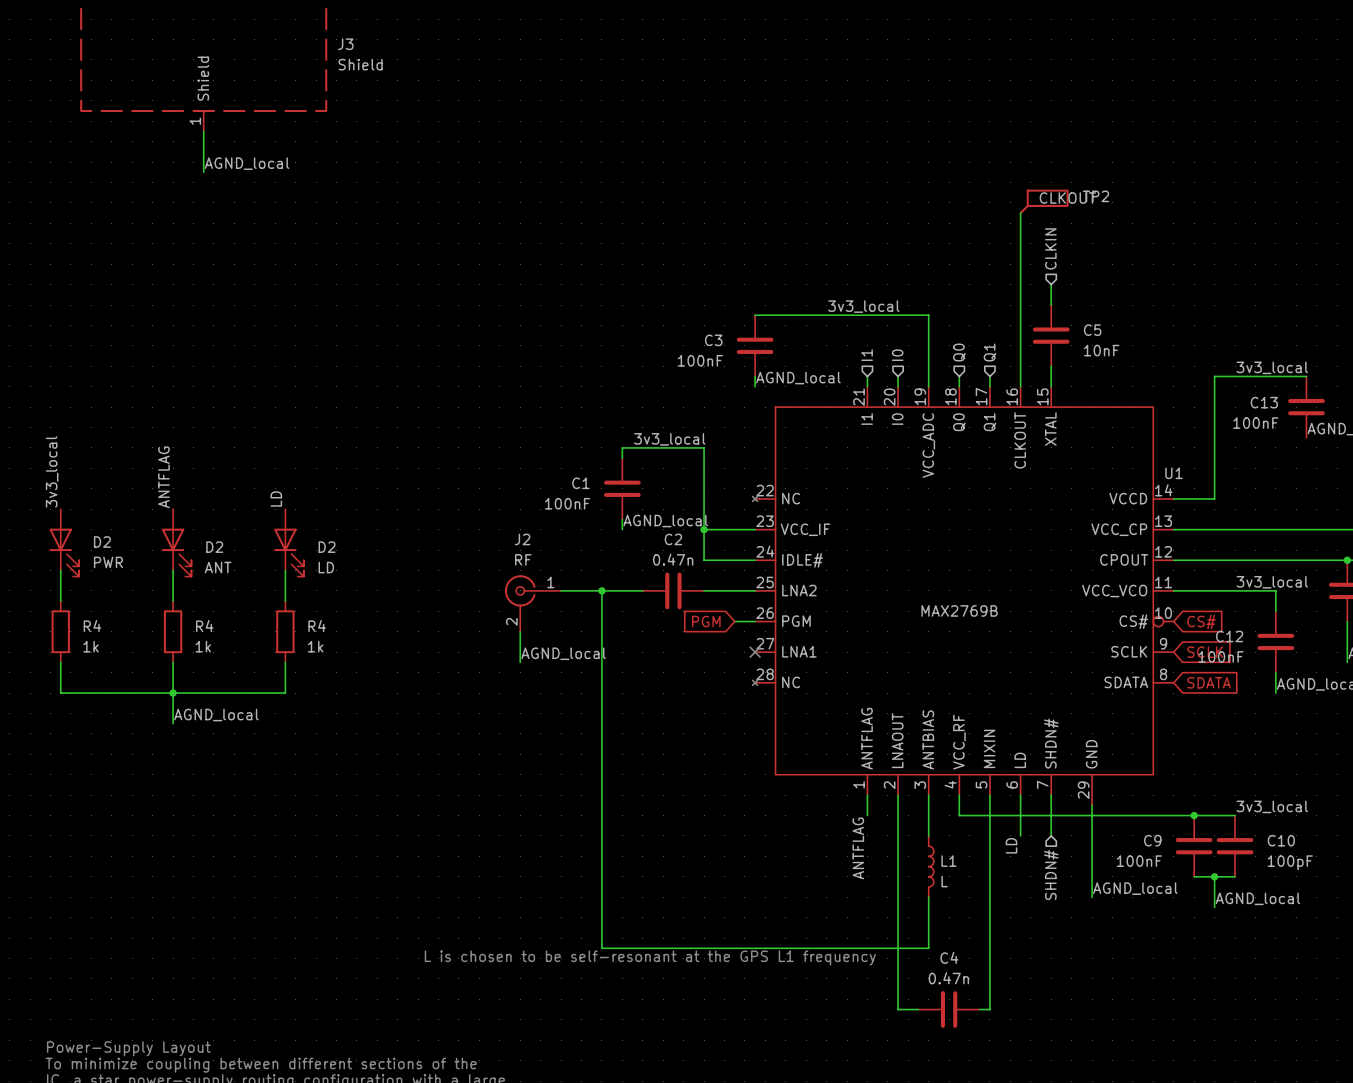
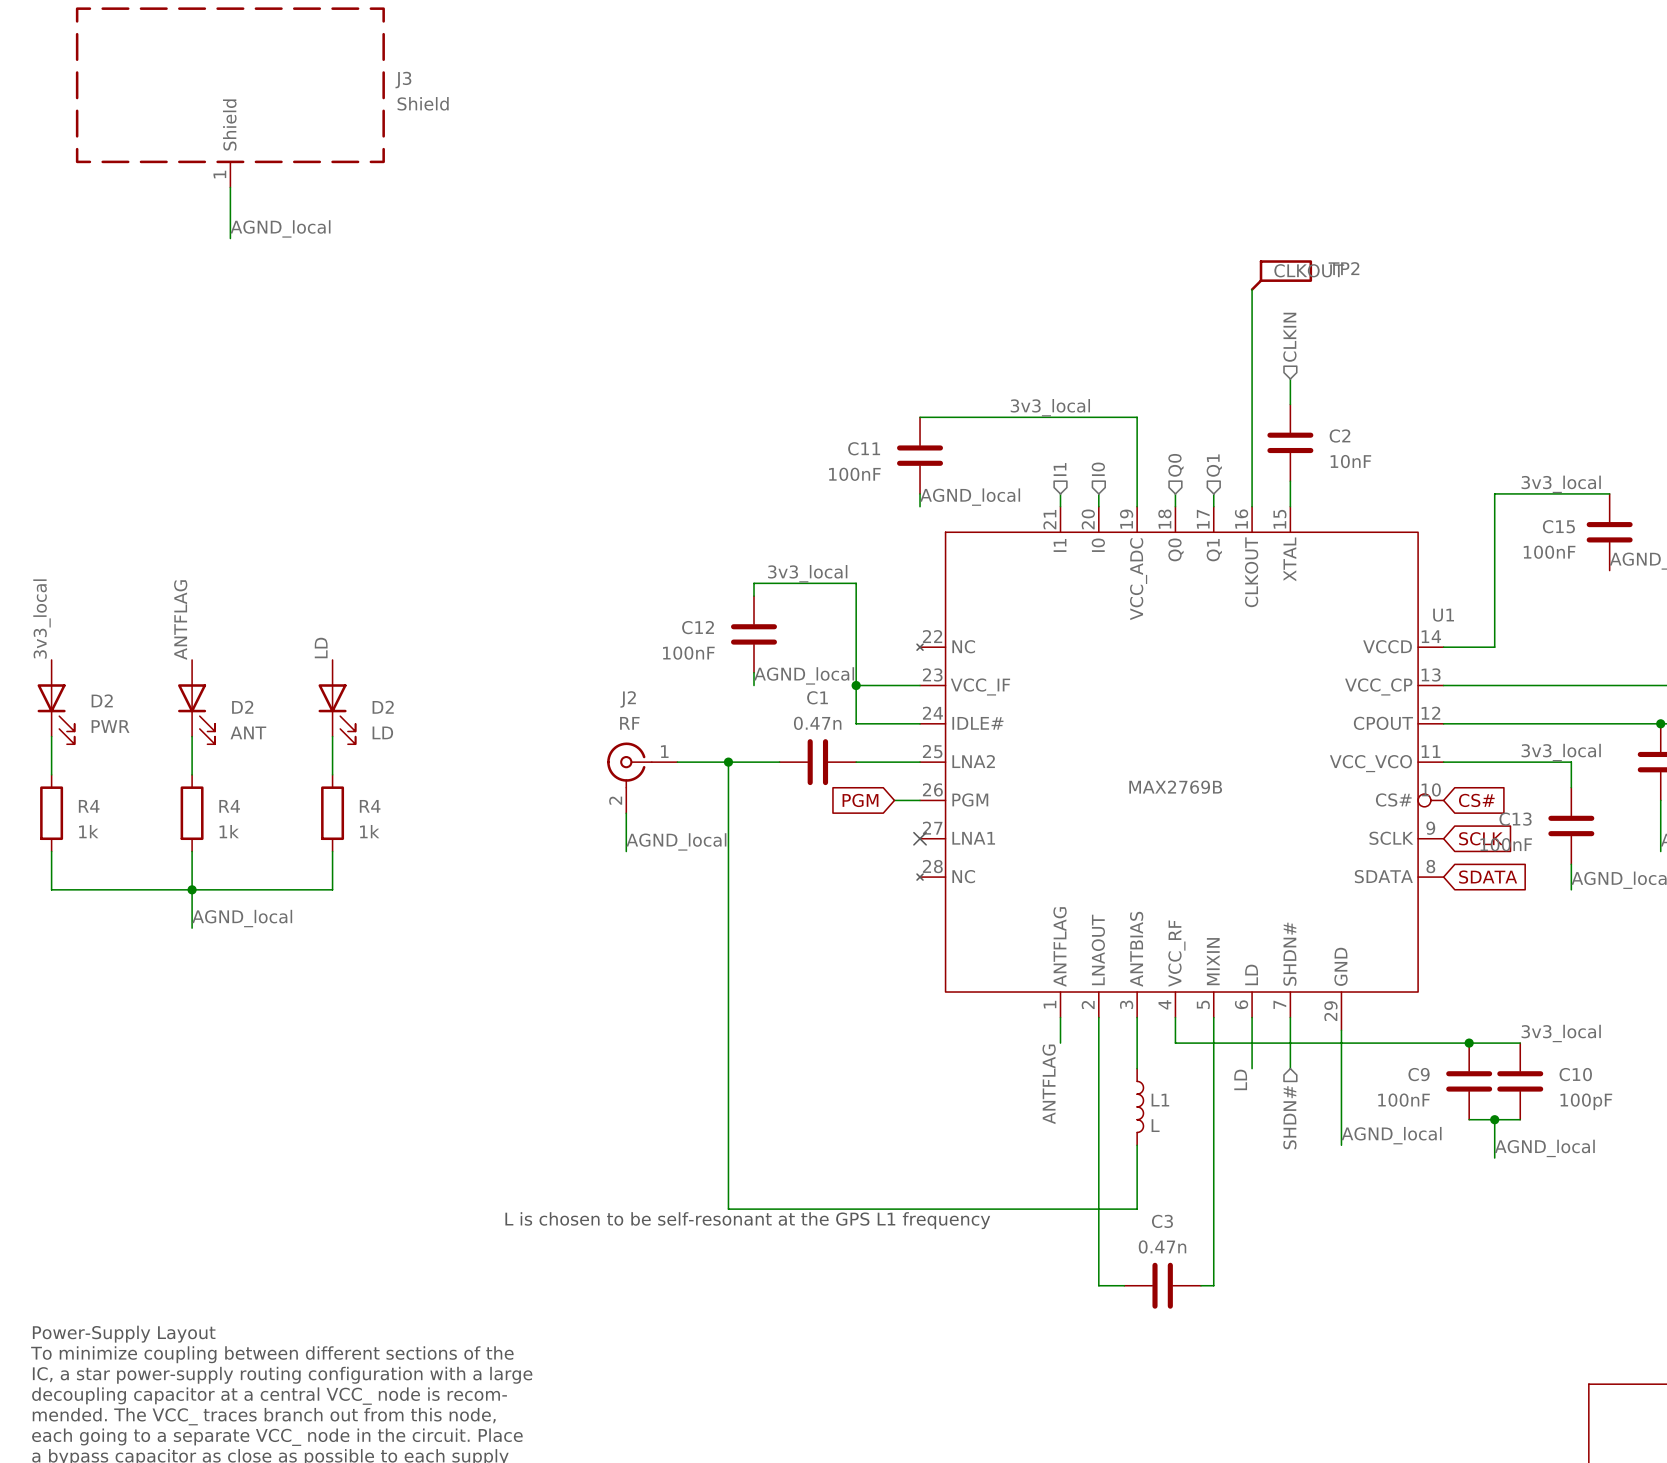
C5 name: C5 (1092, 330) -> C2 (1339, 436)
C3 name: C3 (713, 340) -> C11 (864, 448)
C13 name: C13 (1264, 402) -> C15 (1558, 526)
C1 name: C1 (580, 483) -> C12 (698, 627)
C2 name: C2 (673, 539) -> C1 (817, 697)
C12 name: C12 (1229, 636) -> C13 (1515, 819)
C4 name: C4 (949, 957) -> C3 (1162, 1221)

